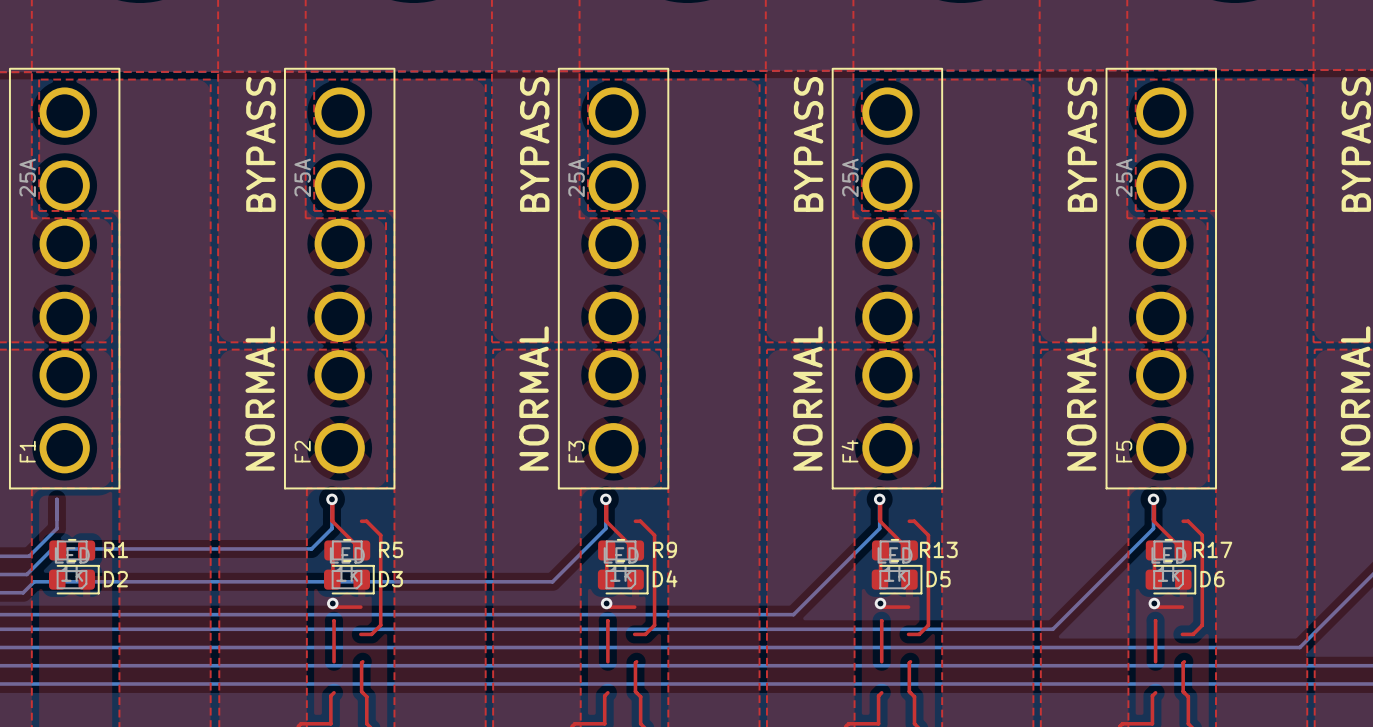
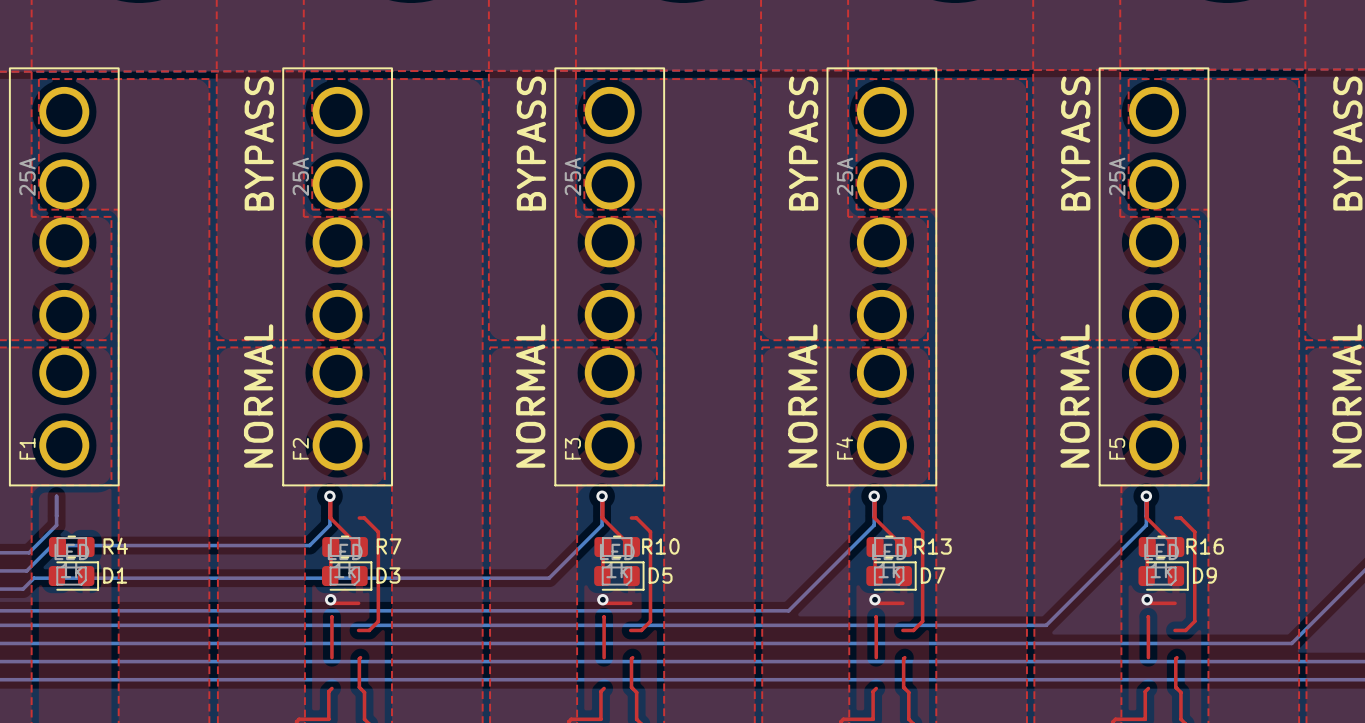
R1 name: R1 (116, 549) -> R4 (115, 546)
R5 name: R5 (391, 549) -> R7 (389, 546)
R9 name: R9 (665, 549) -> R10 (660, 546)
R17 name: R17 (1213, 549) -> R16 (1205, 546)
D4 name: D4 (665, 578) -> D5 (660, 575)
D2 name: D2 (115, 579) -> D1 (115, 575)
D5 name: D5 (938, 579) -> D7 (933, 575)
D6 name: D6 (1212, 579) -> D9 (1204, 575)

